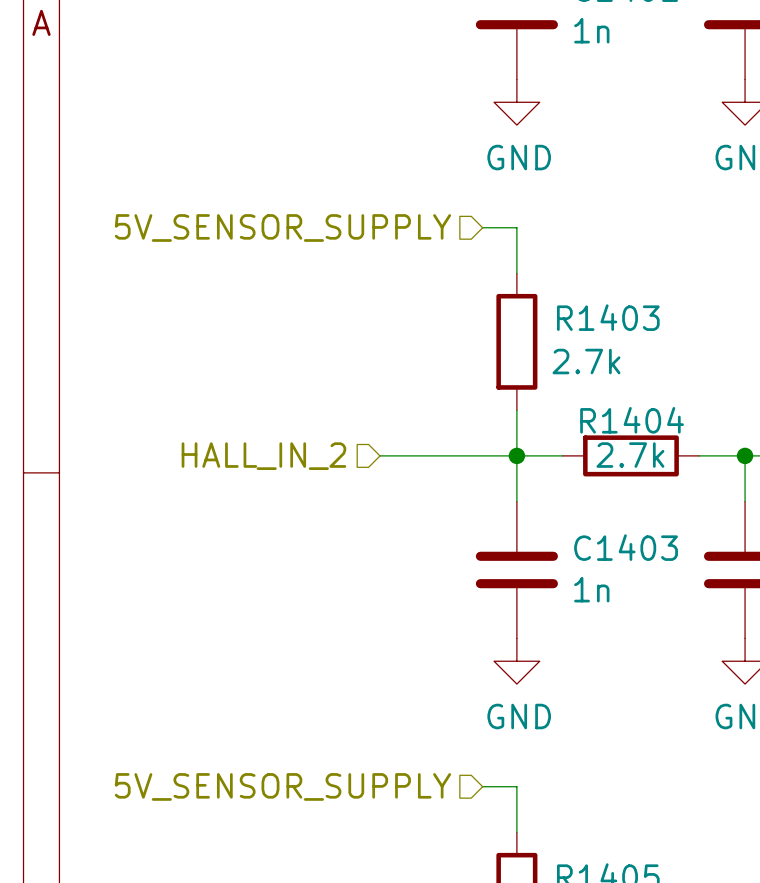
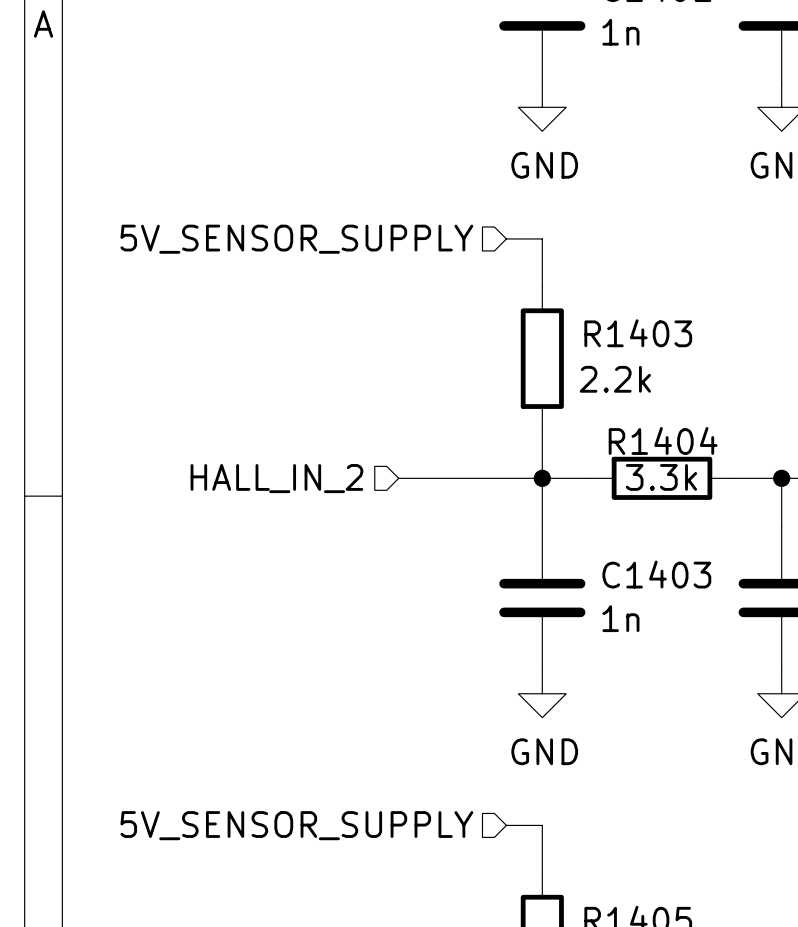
R1403 value: 2.7k (586, 361) -> 2.2k (615, 379)
R1404 value: 2.7k (630, 455) -> 3.3k (661, 477)

